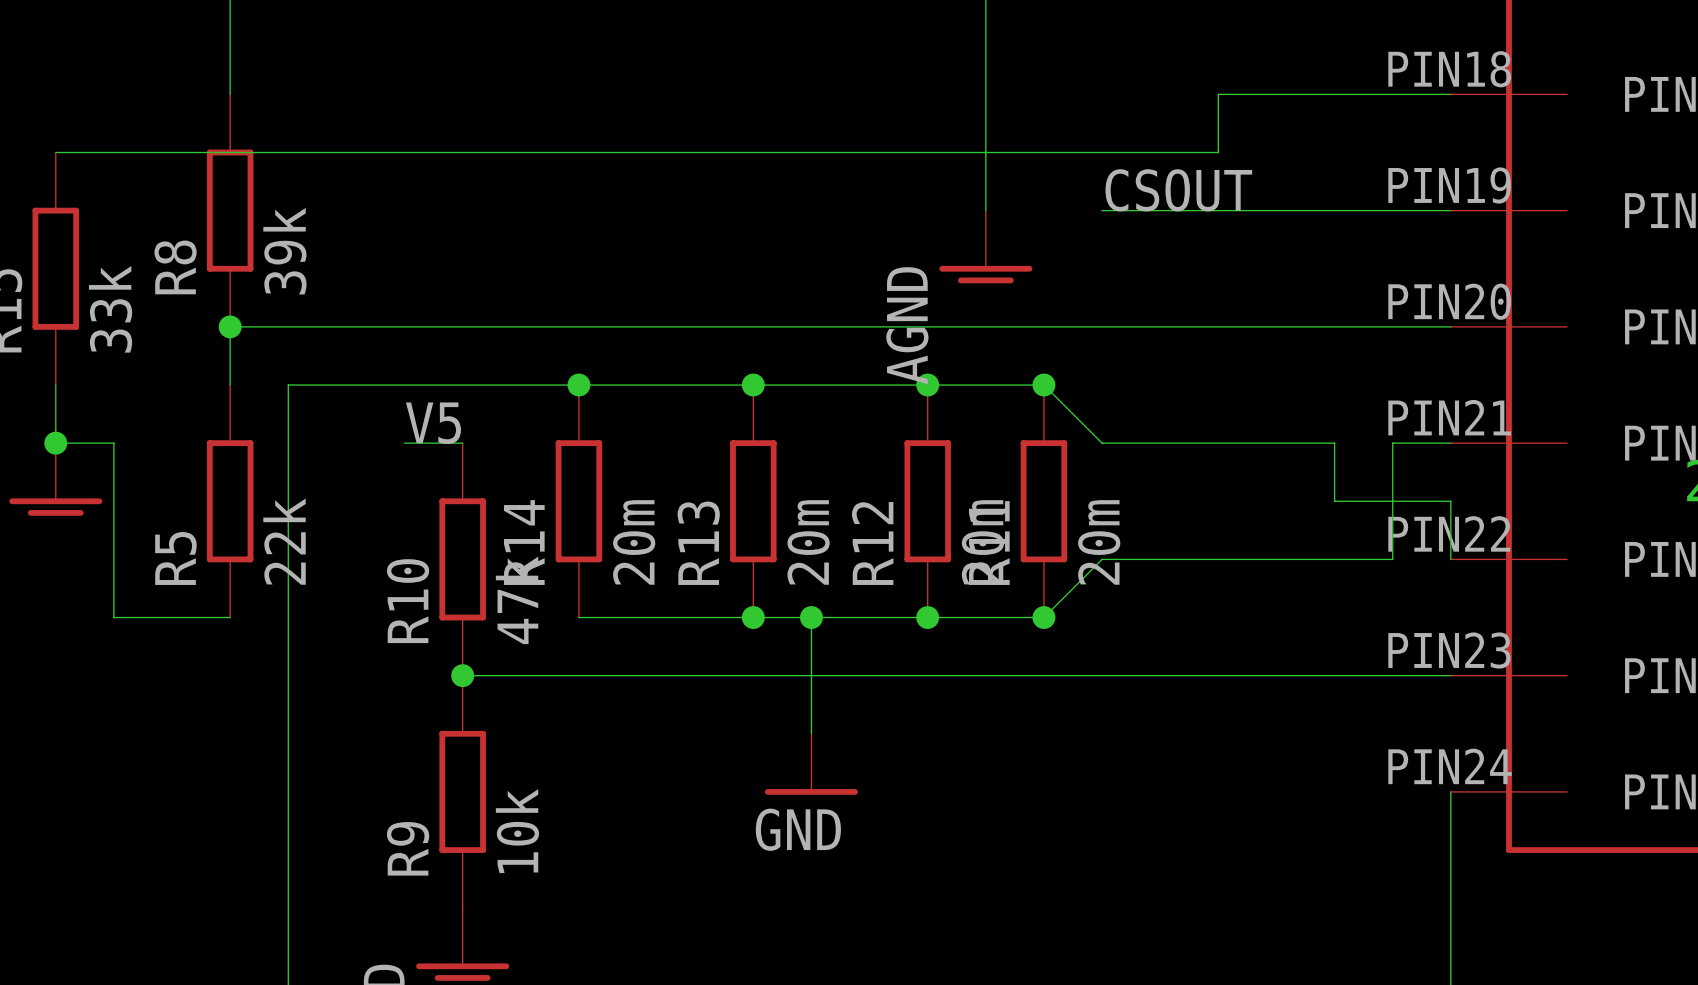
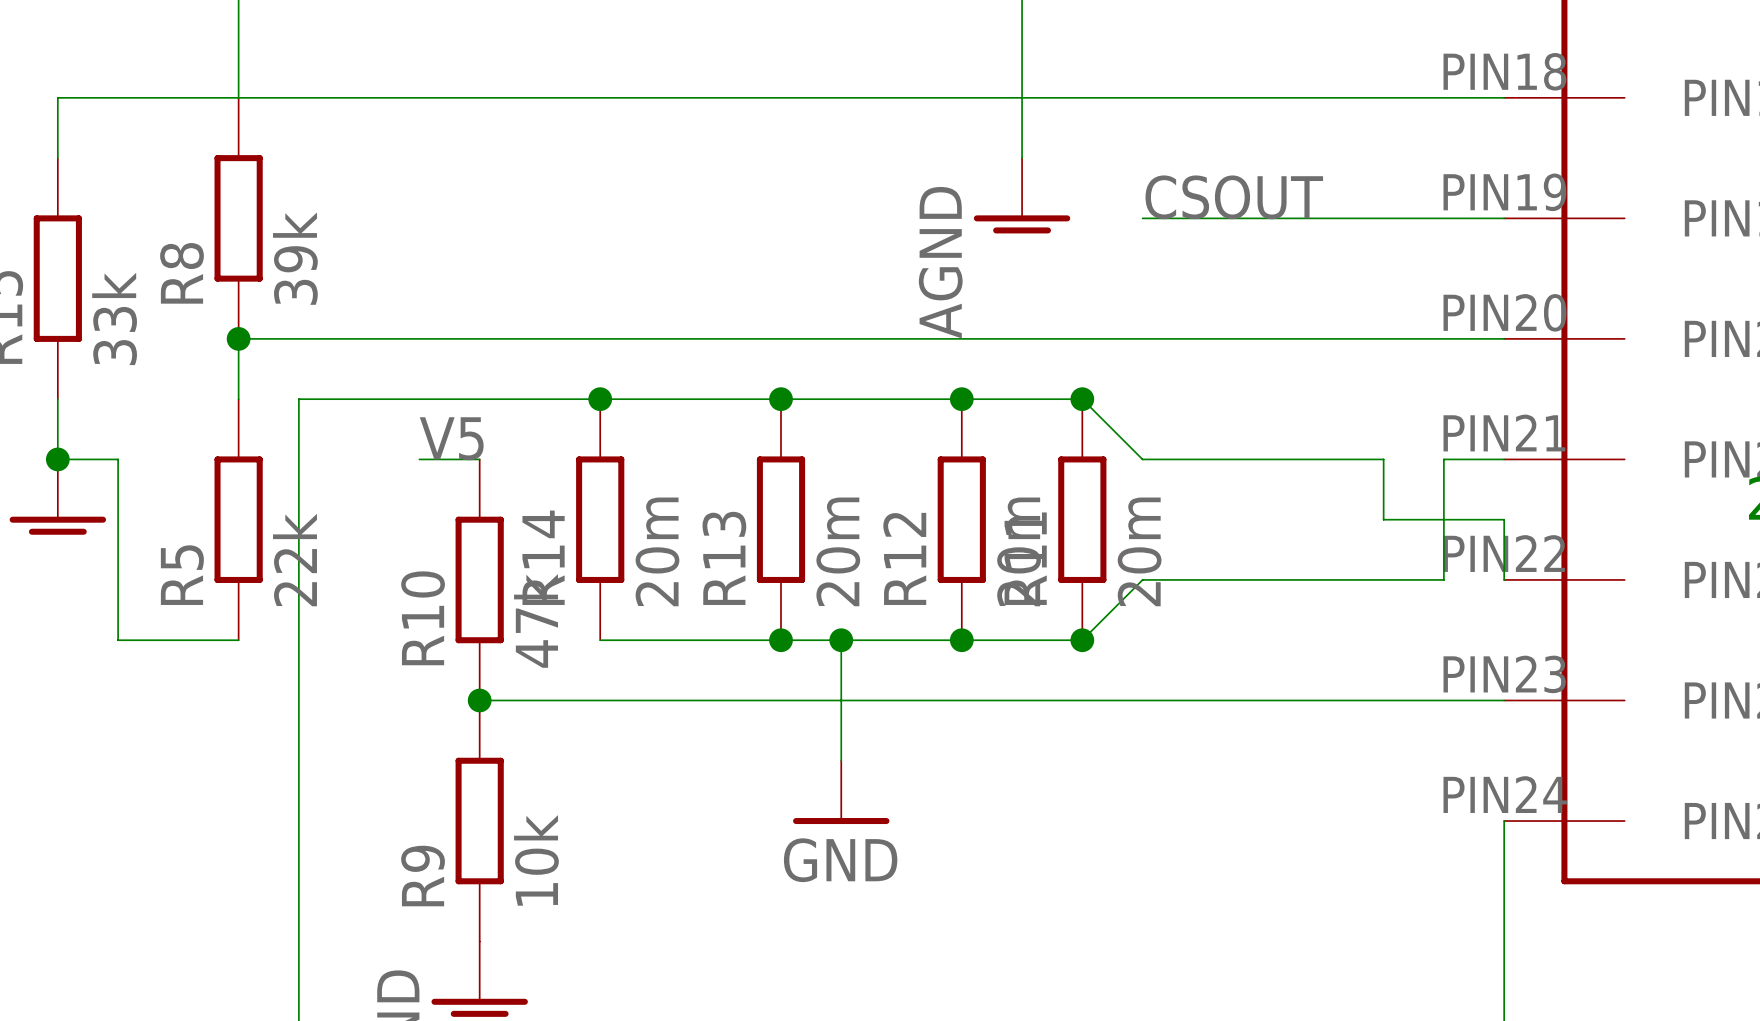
wire: (1218, 94) (1218, 152) (55, 152) -> (1263, 97) (57, 97) (57, 158)
power symbol position: AGND (985, 246) -> AGND (1022, 195)

